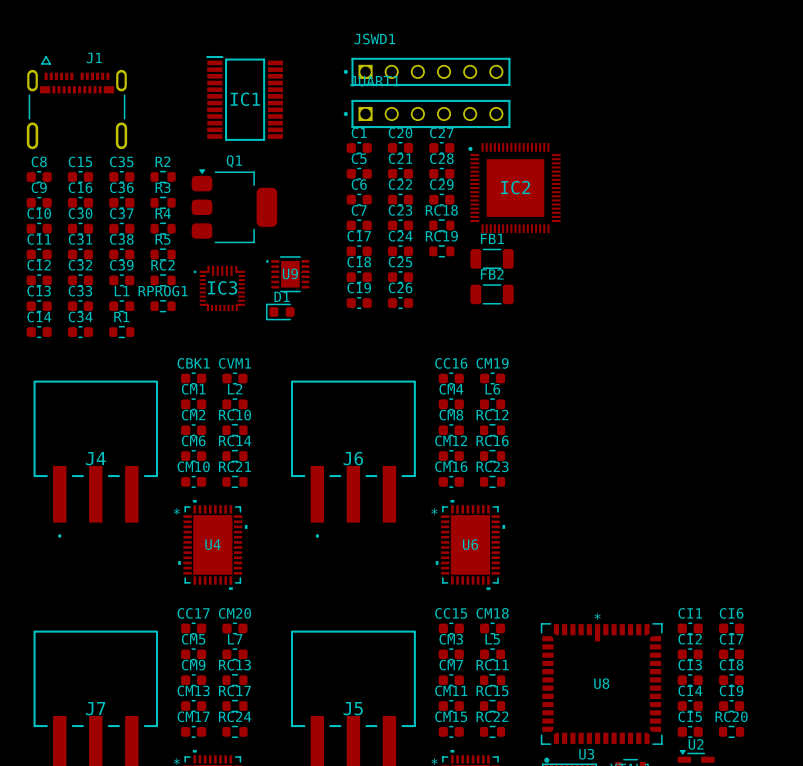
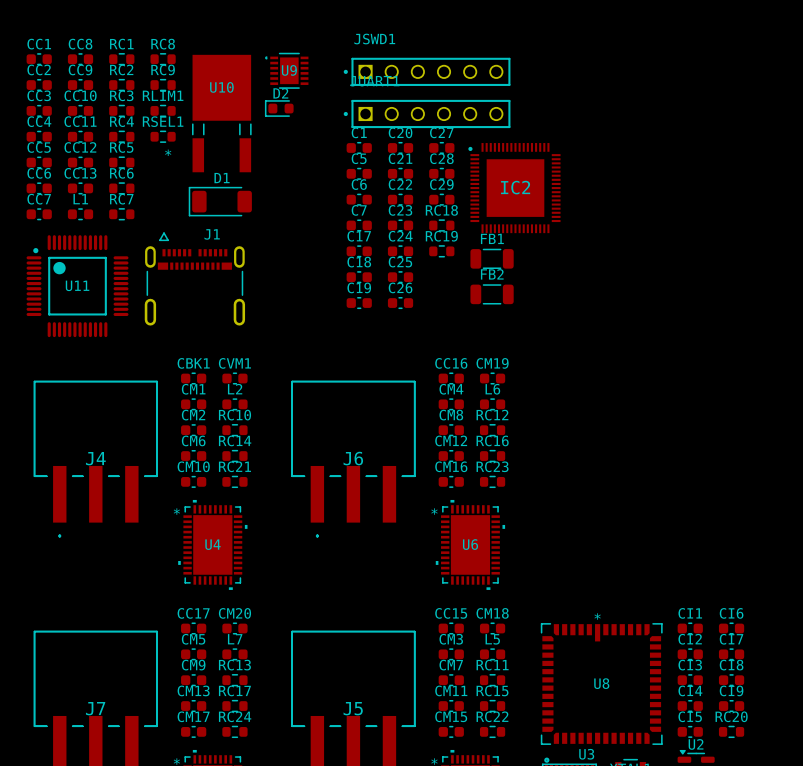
CC1: none -> (39, 59)
CC8: none -> (80, 59)
RC1: none -> (121, 59)
RC8: none -> (163, 59)
CC2: none -> (39, 85)
CC9: none -> (80, 85)
RC9: none -> (163, 85)
IC1: (244, 98) -> none
J1 position: (77, 102) -> (194, 278)
D2: none -> (279, 108)
CC3: none -> (39, 110)
CC10: none -> (80, 110)
RC3: none -> (121, 110)
RLIM1: none -> (163, 110)
U10: none -> (221, 113)
CC4: none -> (39, 136)
CC11: none -> (80, 136)
RC4: none -> (121, 136)
RSEL1: none -> (163, 136)
CC5: none -> (39, 162)
CC12: none -> (80, 162)
RC5: none -> (121, 162)
C8: (39, 177) -> none
C15: (80, 177) -> none
C35: (121, 177) -> none
R2: (163, 177) -> none
CC6: none -> (39, 188)
CC13: none -> (80, 188)
RC6: none -> (121, 188)
C9: (39, 202) -> none
C16: (80, 202) -> none
C36: (121, 202) -> none
R3: (163, 202) -> none
Q1: (234, 206) -> none
CC7: none -> (39, 214)
RC7: none -> (121, 214)
C10: (39, 228) -> none
C30: (80, 228) -> none
C37: (121, 228) -> none
R4: (163, 228) -> none
C11: (39, 254) -> none
C31: (80, 254) -> none
C38: (121, 254) -> none
R5: (163, 254) -> none
U9 position: (287, 274) -> (286, 70)
C12: (39, 280) -> none
C32: (80, 280) -> none
C39: (121, 280) -> none
RC2 position: (163, 280) -> (121, 85)
U11: none -> (77, 286)
IC3: (219, 288) -> none
D1 footprint: [266, 303, 295, 321] -> [188, 186, 252, 217]
C13: (39, 306) -> none
C33: (80, 306) -> none
L1 position: (121, 306) -> (80, 214)
RPROG1: (163, 306) -> none
C14: (39, 332) -> none
C34: (80, 332) -> none
R1: (121, 332) -> none

